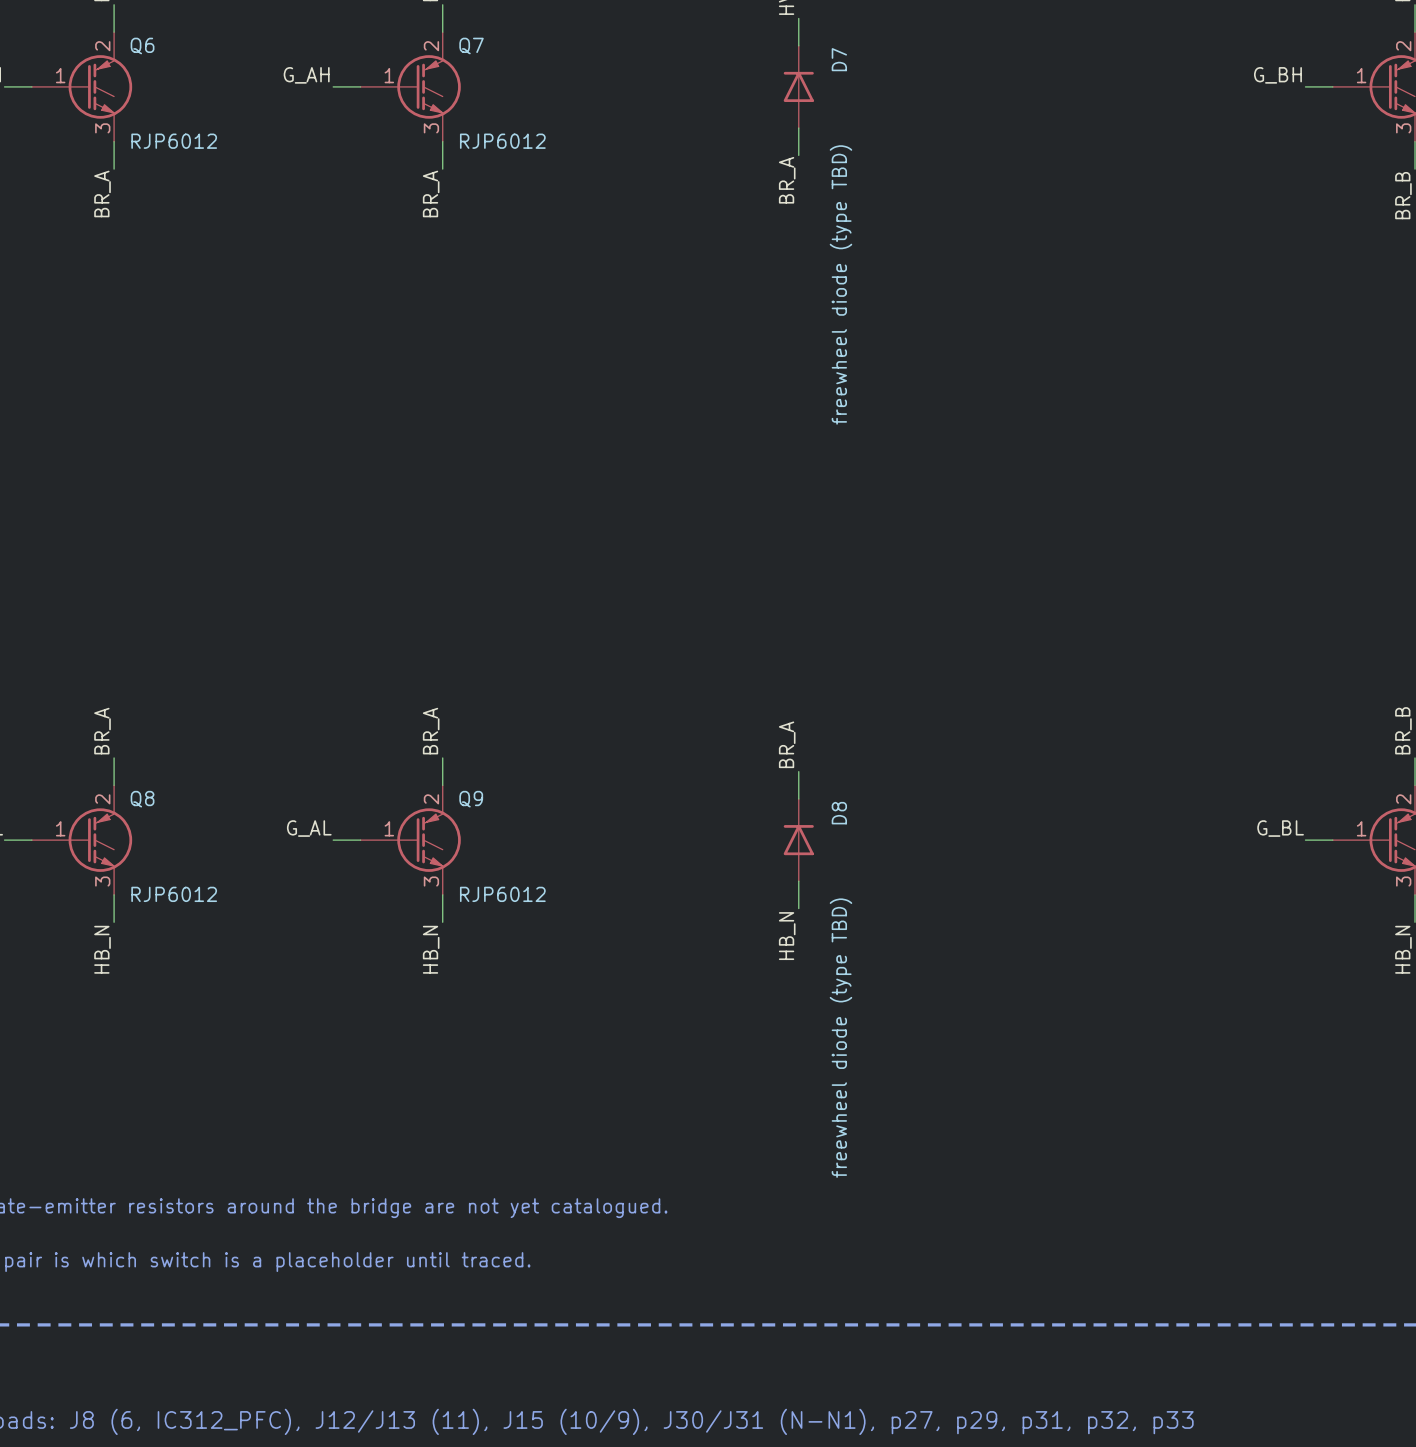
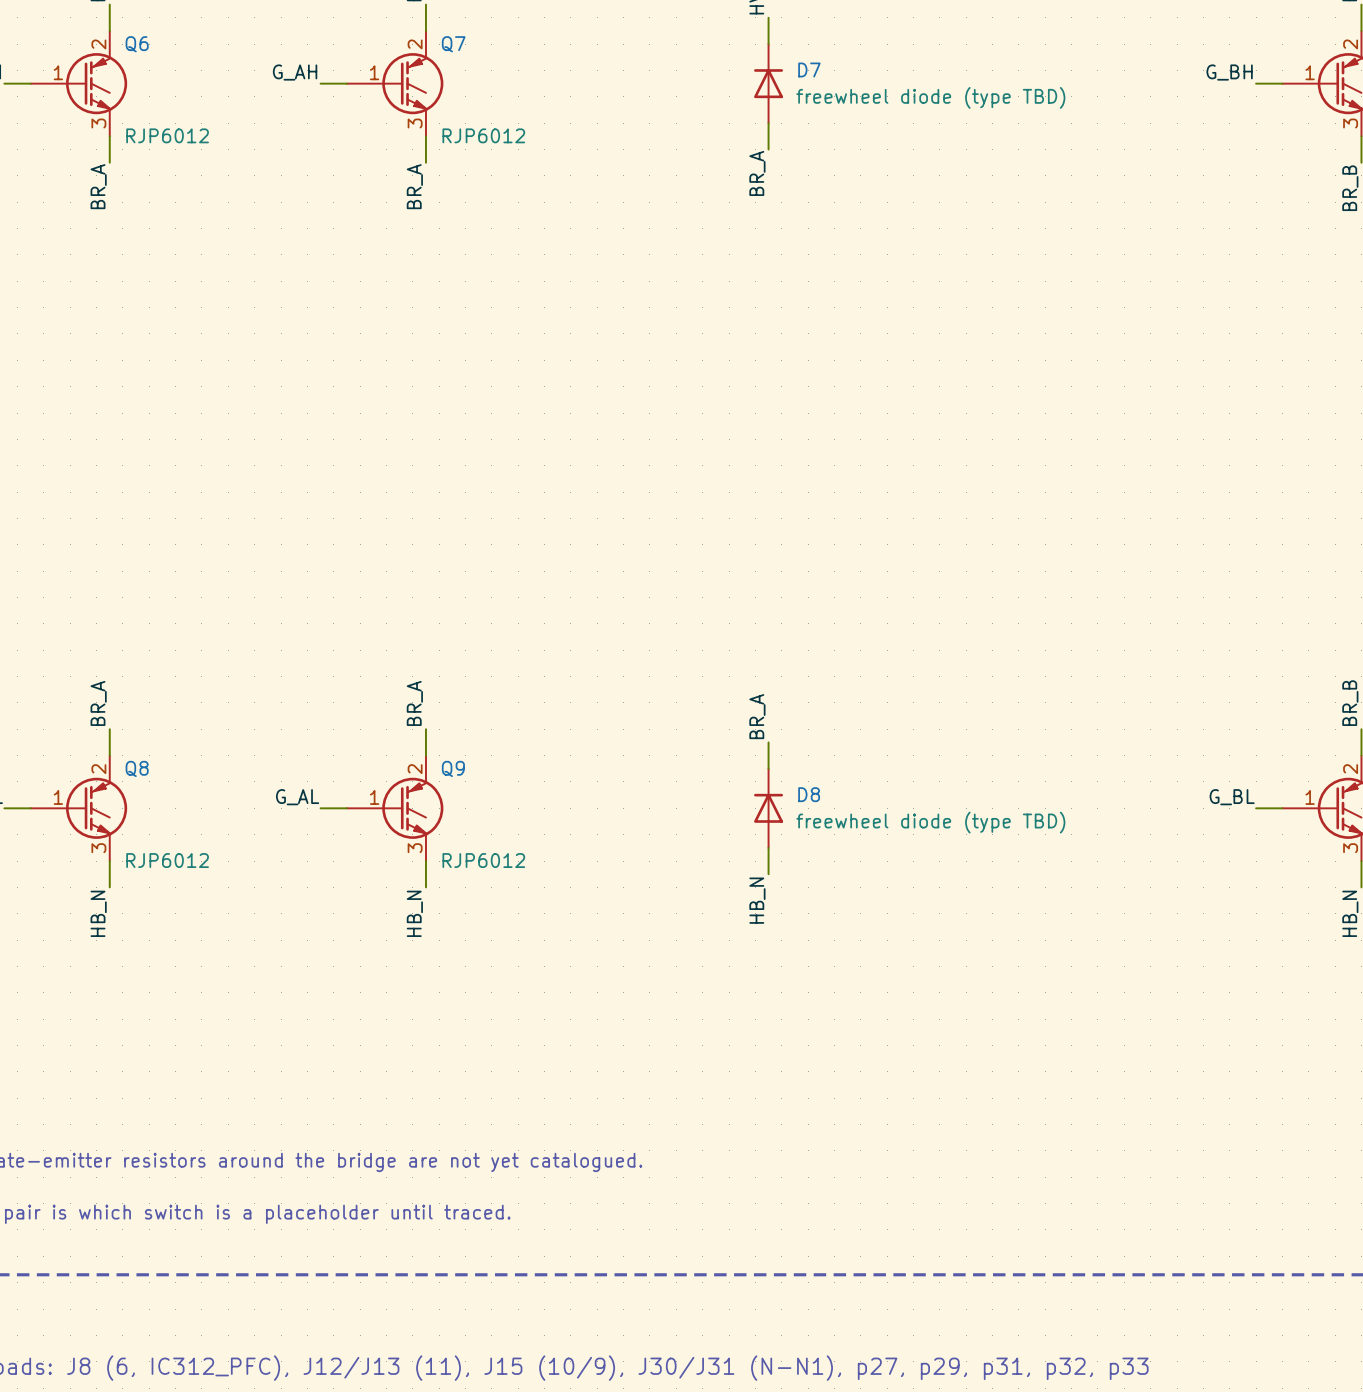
D7 name rotation: 0° (839, 59) -> 90° clockwise (809, 69)
D7 value rotation: 0° (840, 284) -> 90° clockwise (930, 97)
D8 name rotation: 0° (839, 813) -> 90° clockwise (809, 794)
D8 value rotation: 0° (840, 1038) -> 90° clockwise (930, 822)

